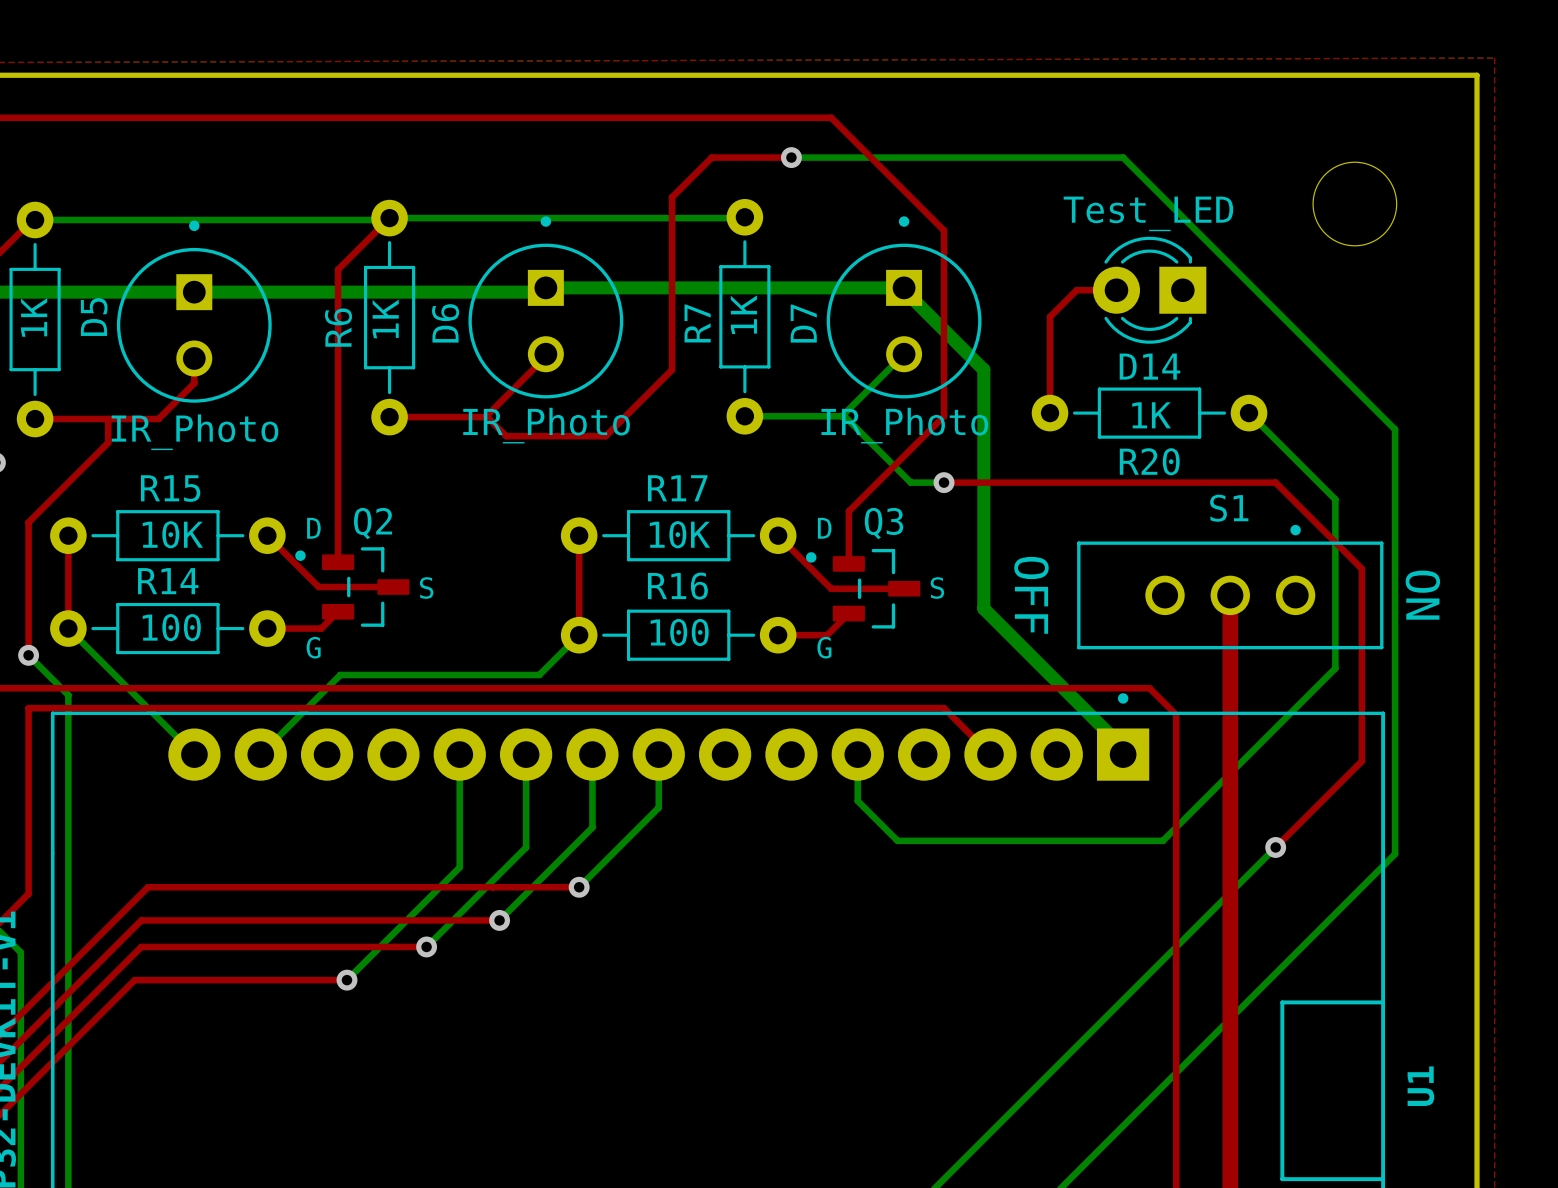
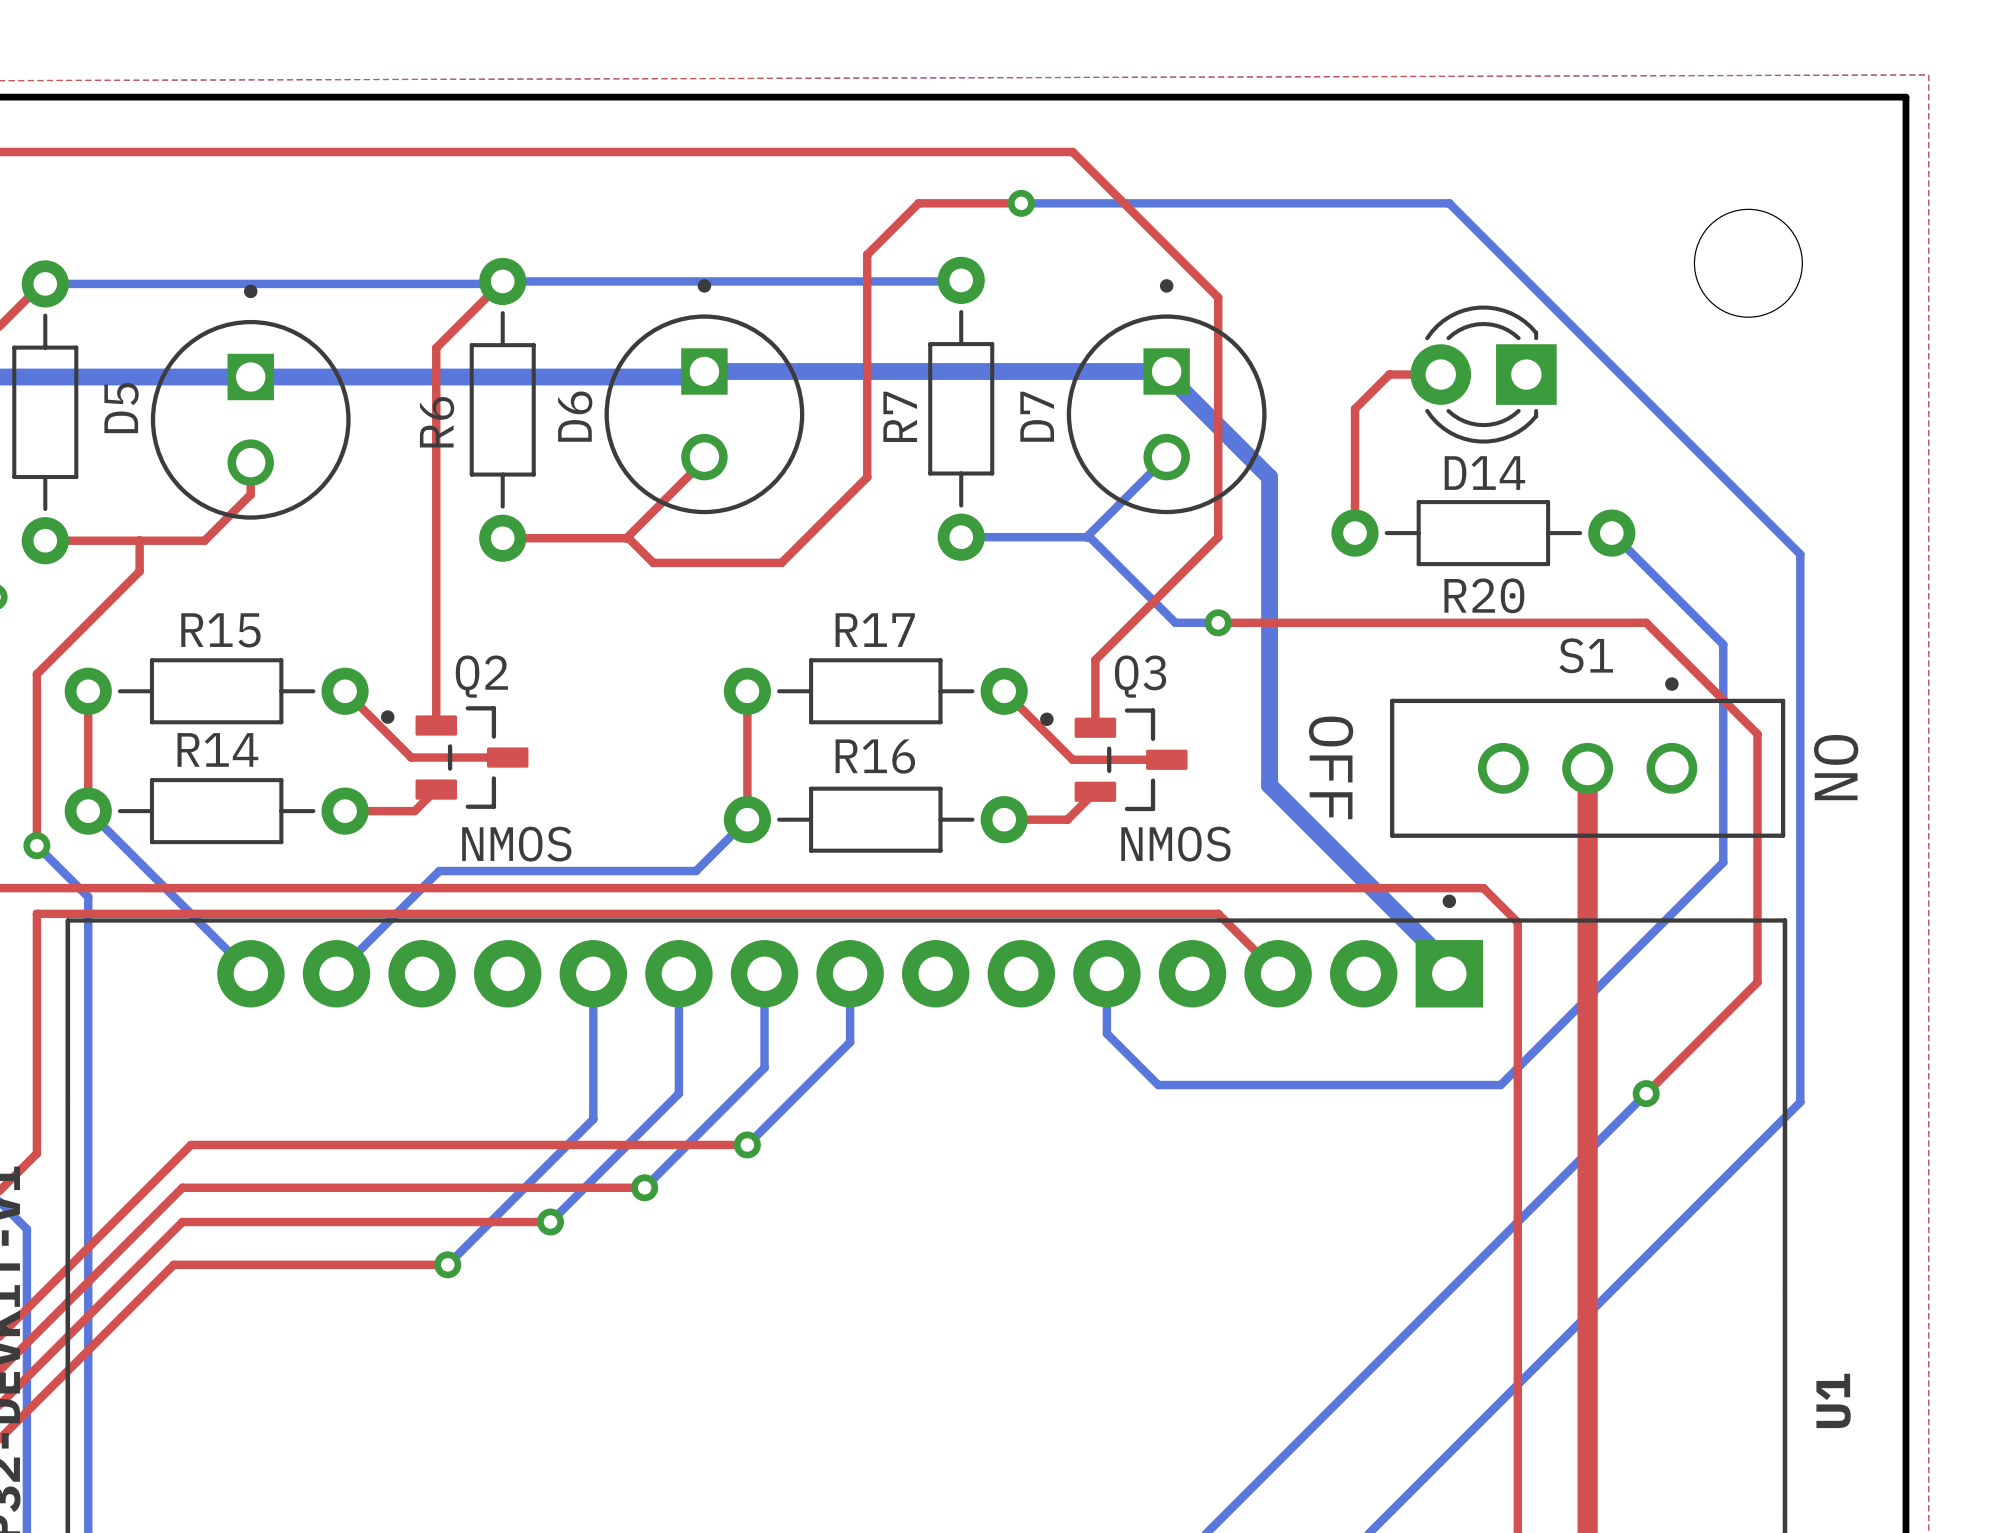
D14 value: Test_LED (1148, 213) -> none
R7 value: 1K (743, 314) -> none
part value: 1K (34, 317) -> none
R6 value: 1K (385, 318) -> none
R20 value: 1K (1151, 415) -> none
D6 value: IR_Photo (546, 425) -> none
D7 value: IR_Photo (904, 425) -> none
D5 value: IR_Photo (194, 432) -> none
text: D (313, 528) -> none
text: D (824, 528) -> none
R15 value: 10K (172, 534) -> none
R17 value: 10K (679, 534) -> none
text: S (426, 587) -> none
text: S (937, 587) -> none
R14 value: 100 (171, 627) -> none
R16 value: 100 (679, 632) -> none
text: G (313, 647) -> none
text: G (824, 647) -> none
Q2 value: none -> NMOS (516, 844)
Q3 value: none -> NMOS (1175, 844)
line: (1383, 1002) (1282, 1002) (1282, 1179) (1383, 1179) -> none

